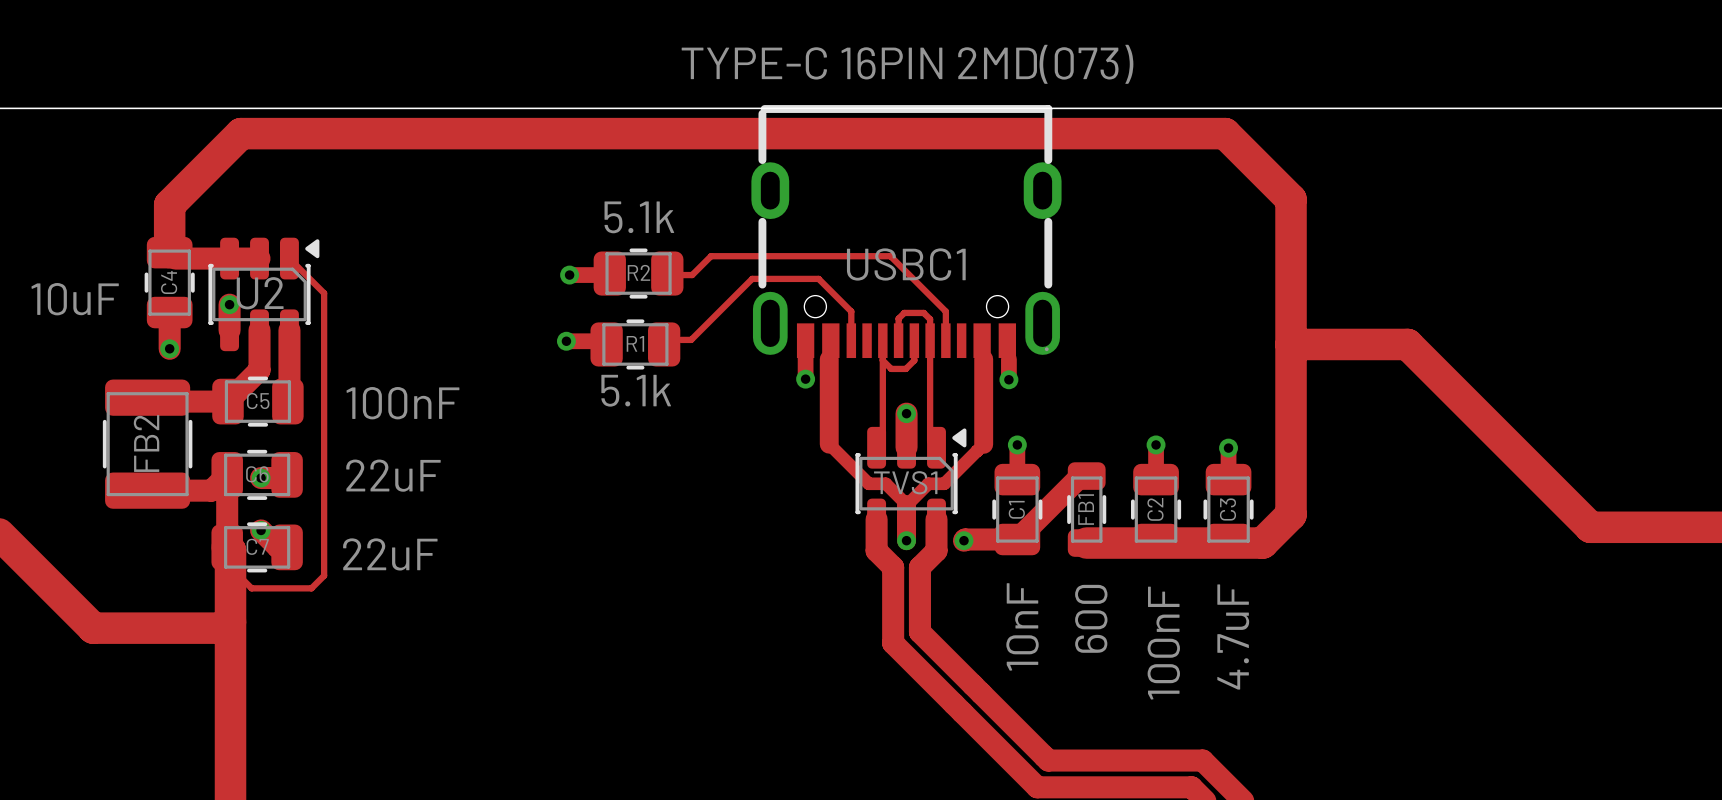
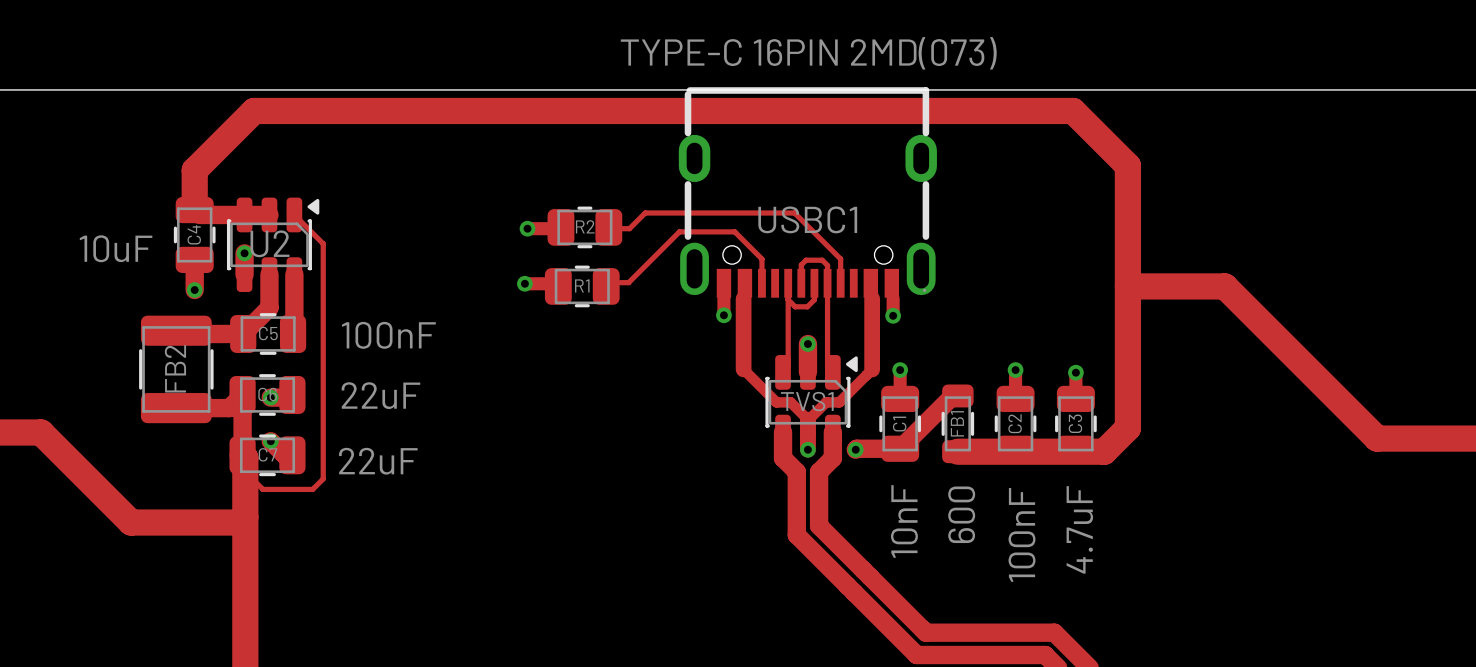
R2 value: 5.1k (639, 217) -> none
R1 value: 5.1k (636, 390) -> none

